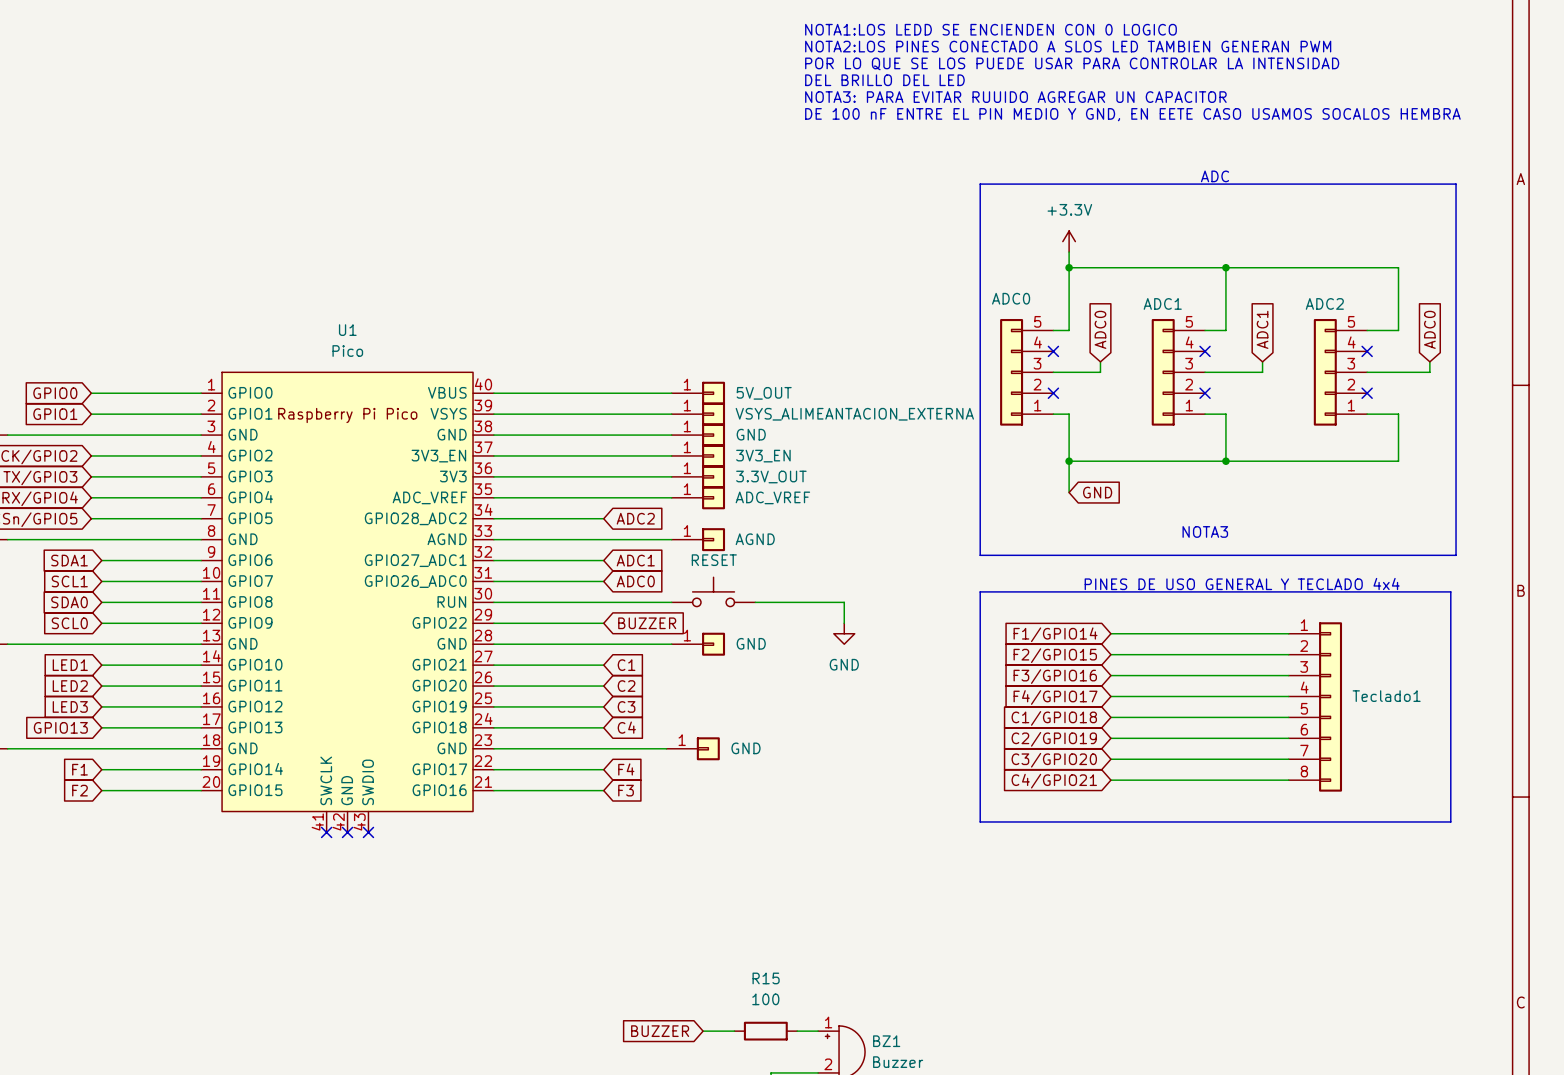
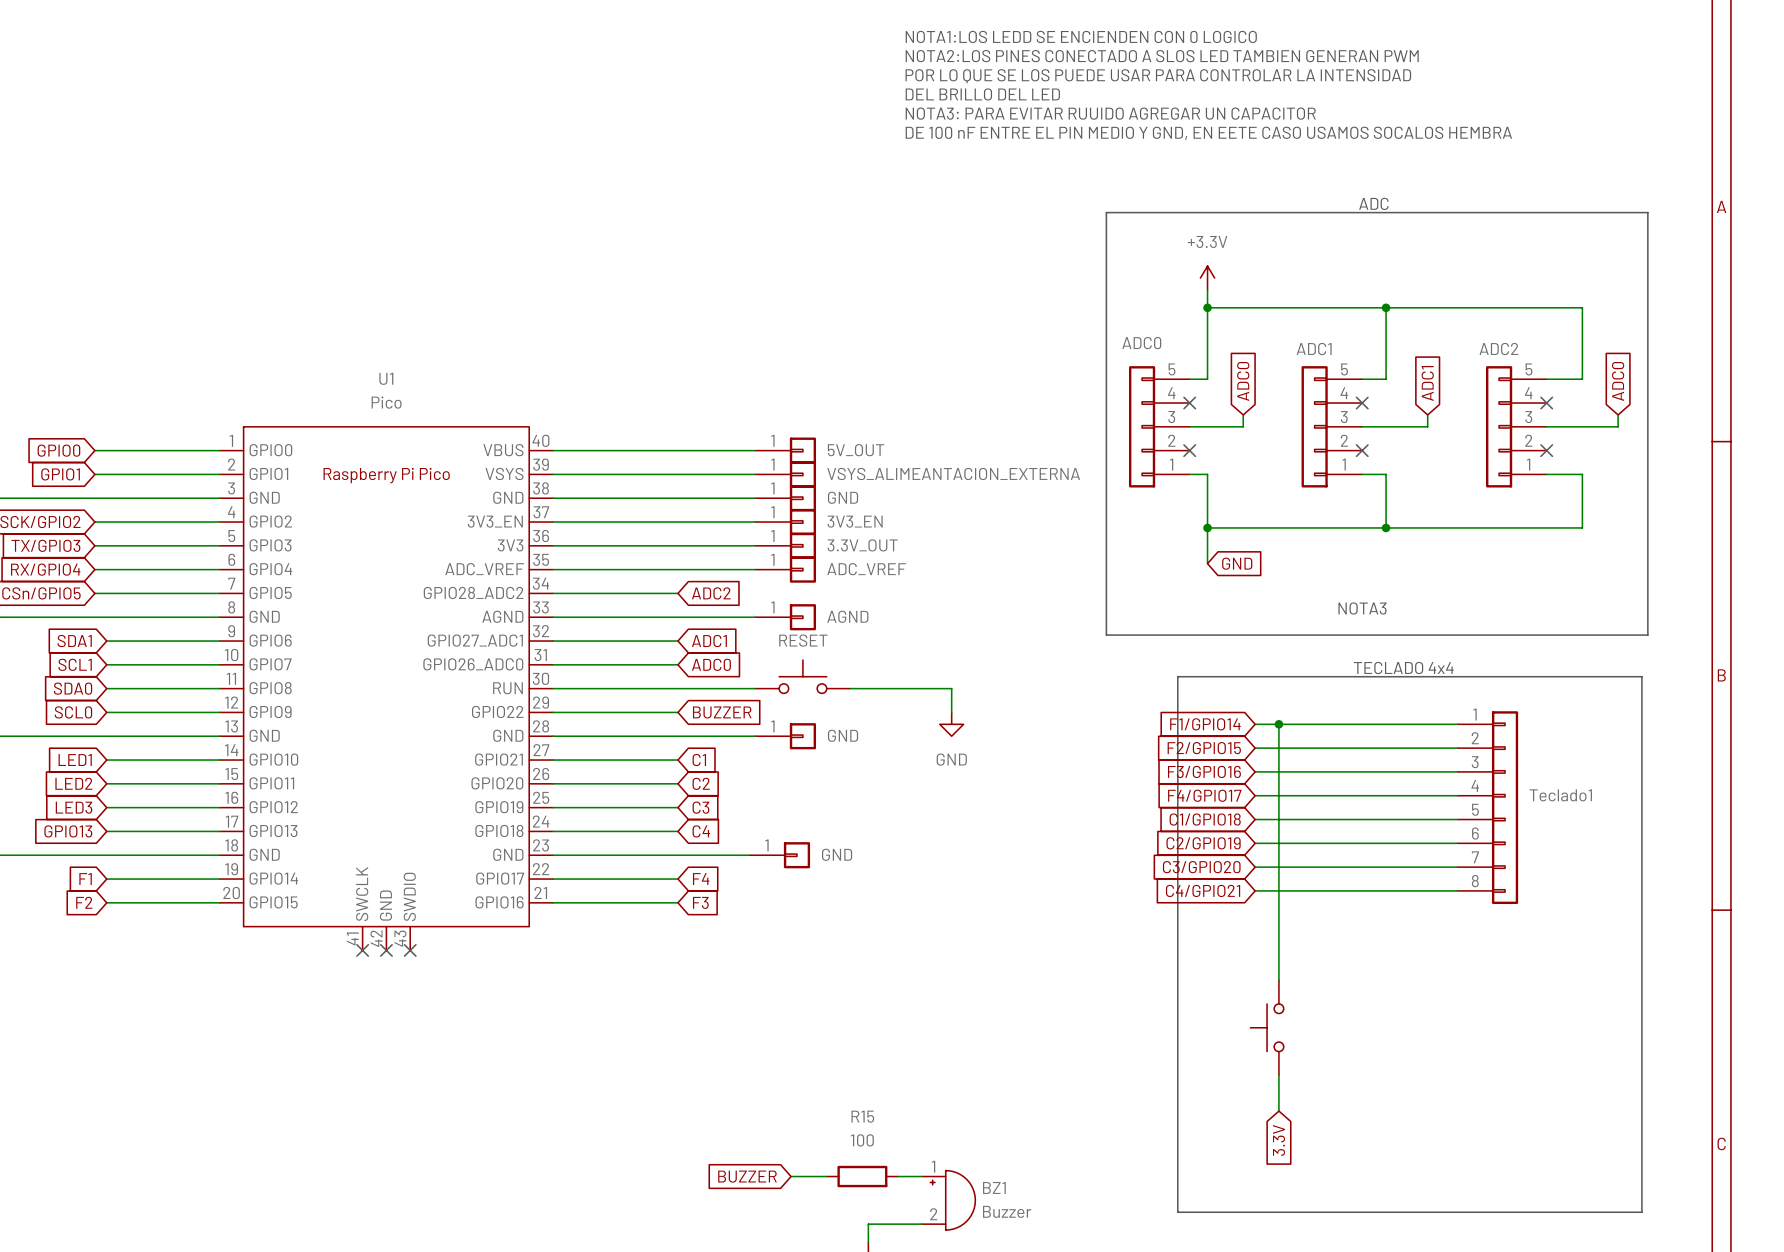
text: PINES DE USO GENERAL Y TECLADO 4x4 (1242, 583) -> TECLADO 4x4 (1403, 667)
line: (1042, 591) (980, 591) (980, 821) (1450, 821) -> (1177, 676) (1177, 1212) (1641, 1212) (1641, 938)
wire: none -> (1278, 724) (1278, 980)
junction: none -> (1278, 724)
part: none -> (1267, 1027)
wire: none -> (1278, 1075) (1278, 1111)
global label: none -> 3.3V (1279, 1140)

